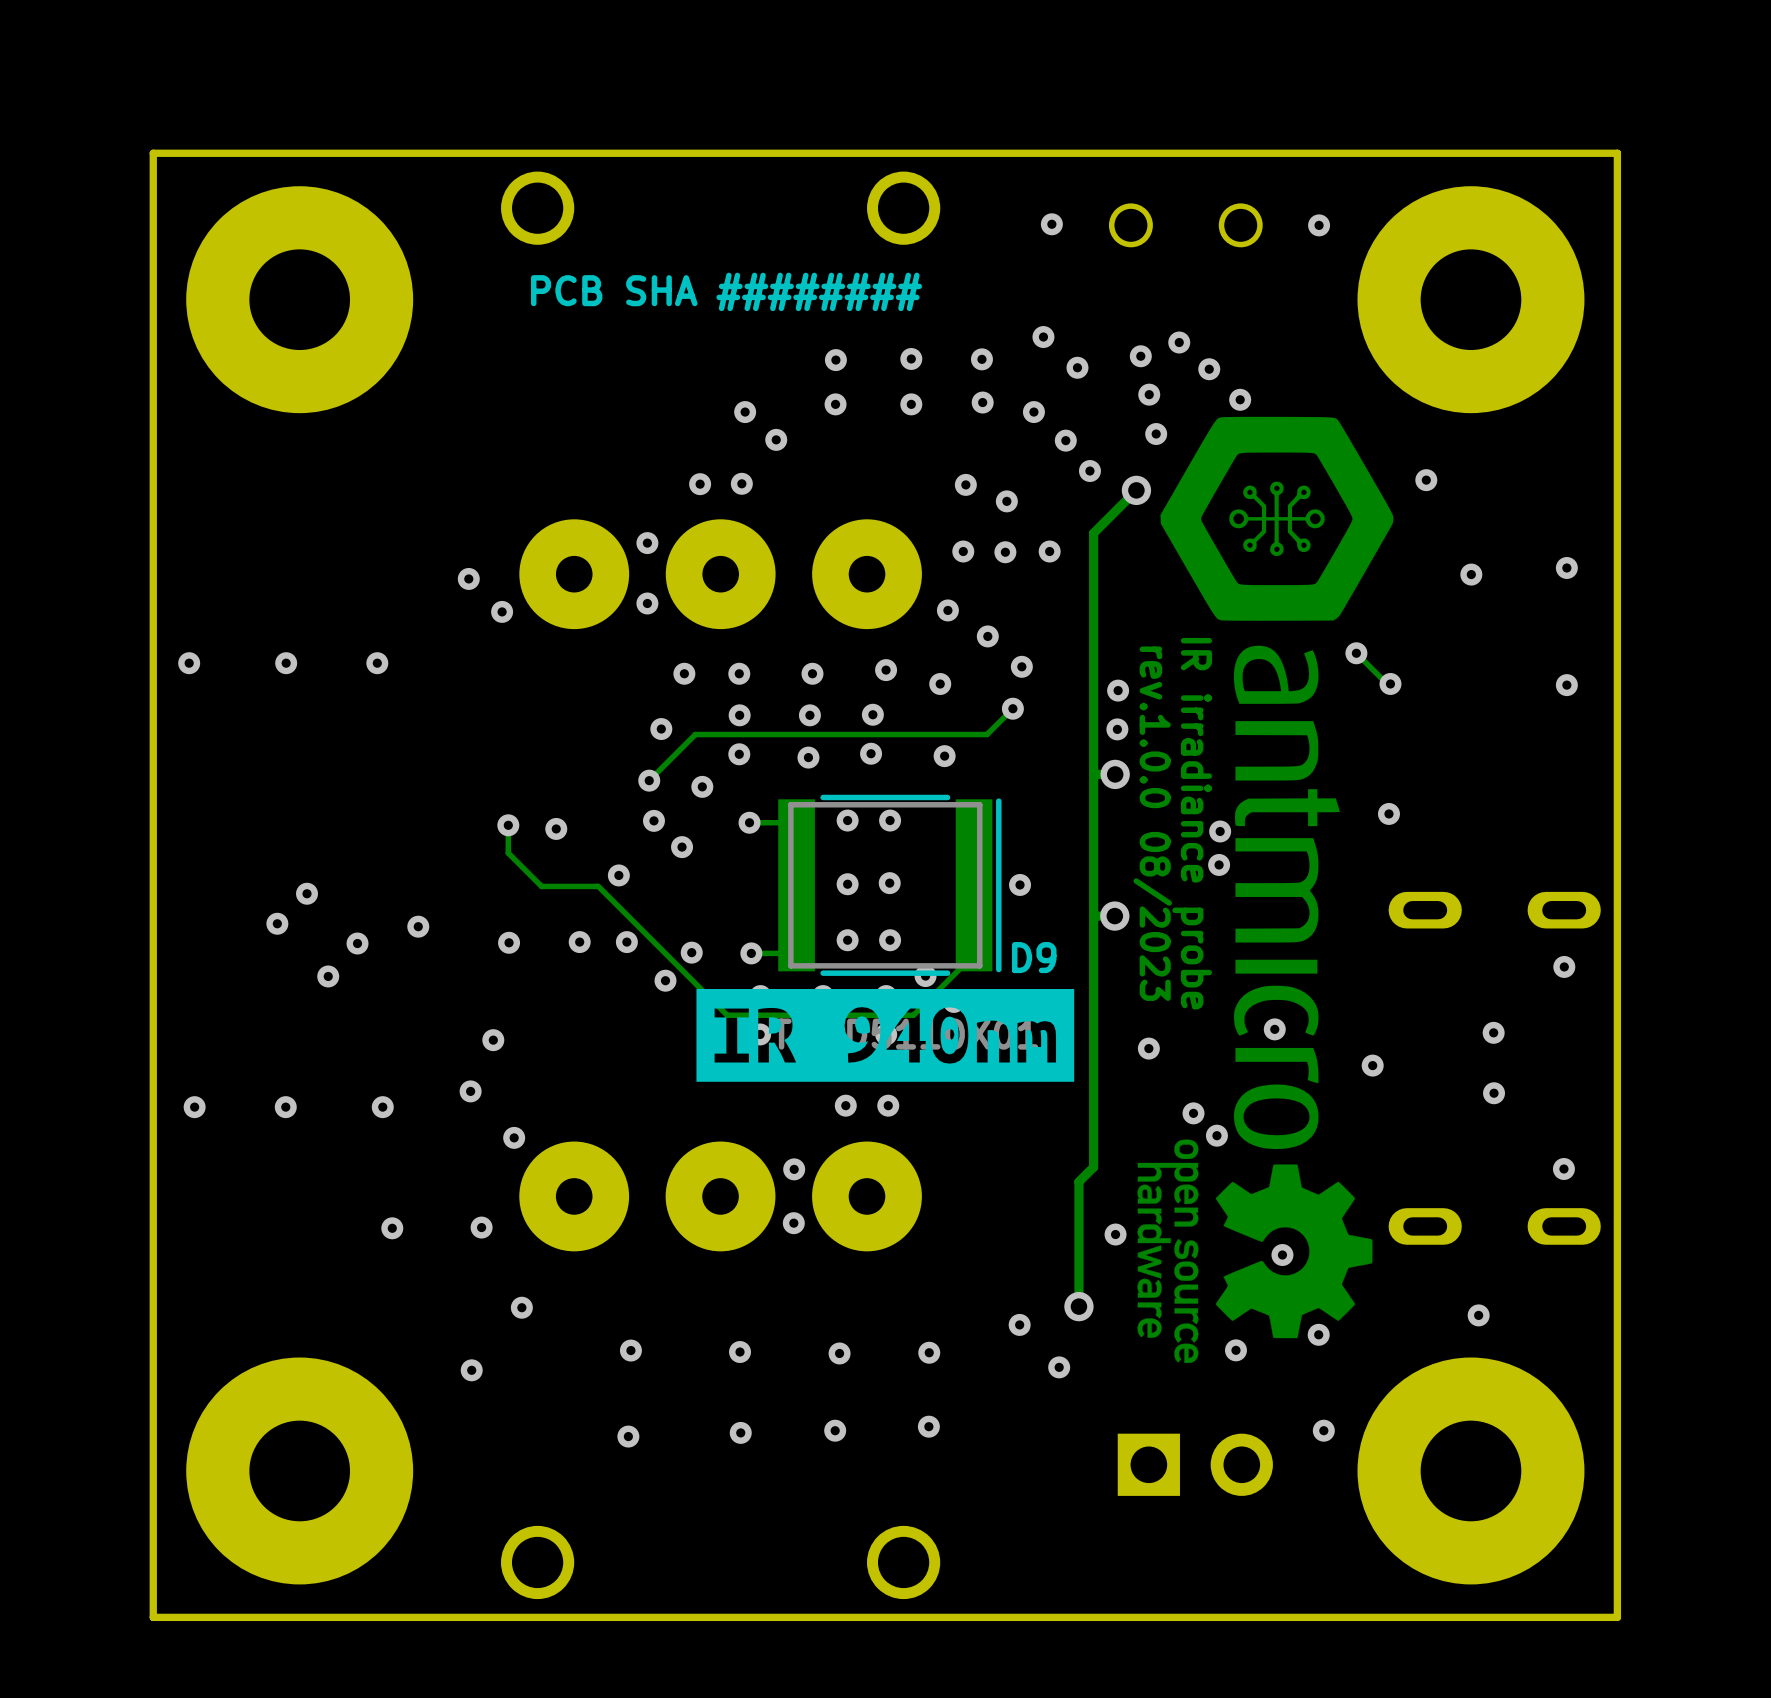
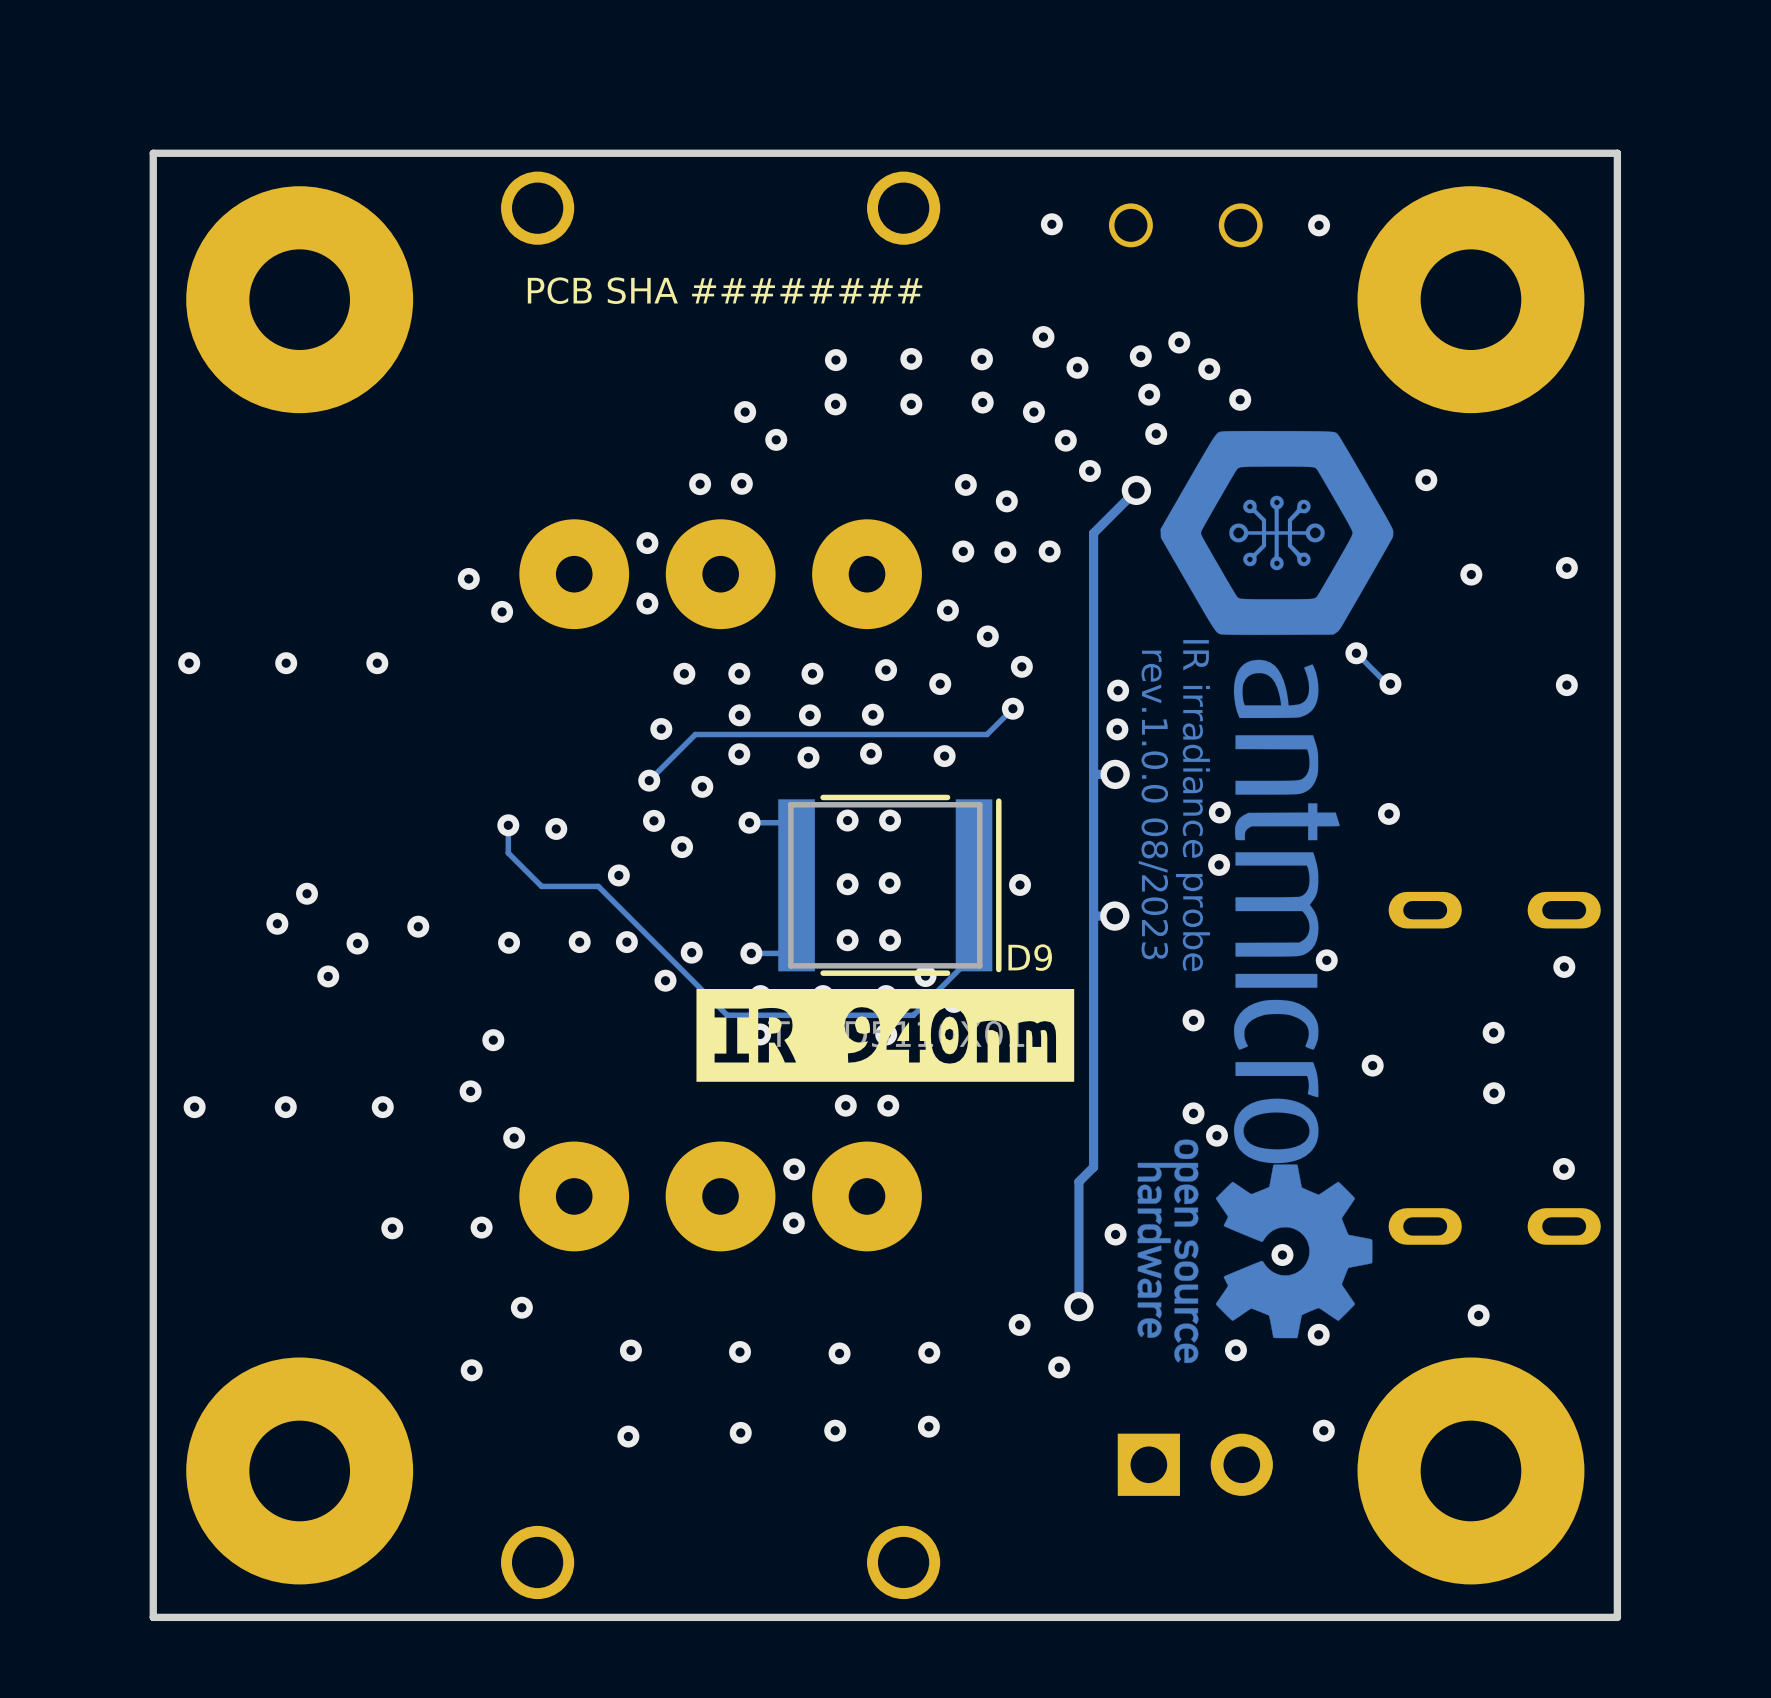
drawing position: (1276, 782) -> (1276, 797)
text position: rev.1.0.0 08/2023 (1152, 823) -> rev.1.0.0 08/2023 (1153, 804)
text position: IR irradiance probe (1192, 823) -> IR irradiance probe (1192, 805)
via position: (1220, 831) -> (1219, 812)
via: none -> (1326, 960)
via: none -> (1193, 1020)
via: (1274, 1029) -> none
via: (1148, 1048) -> none

